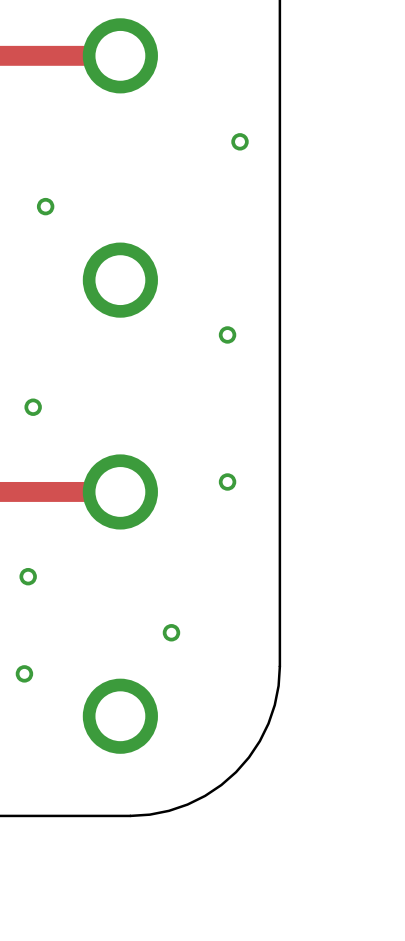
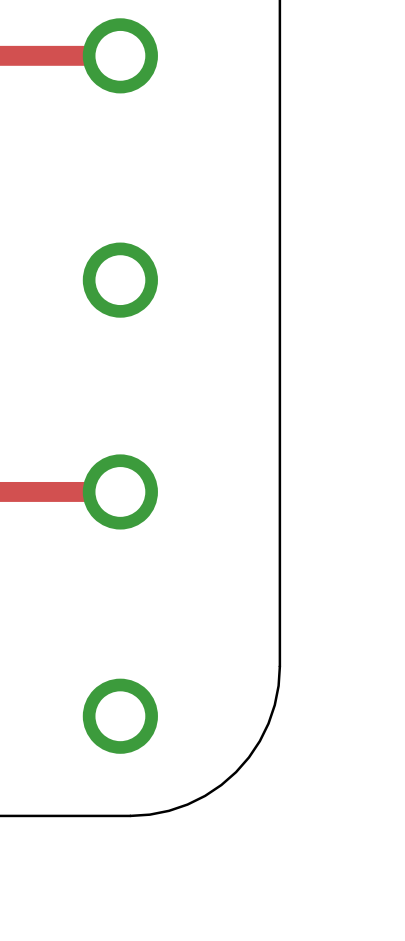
via: (240, 141) -> none
via: (45, 206) -> none
via: (227, 334) -> none
via: (33, 407) -> none
via: (227, 481) -> none
via: (28, 576) -> none
via: (171, 632) -> none
via: (24, 673) -> none

